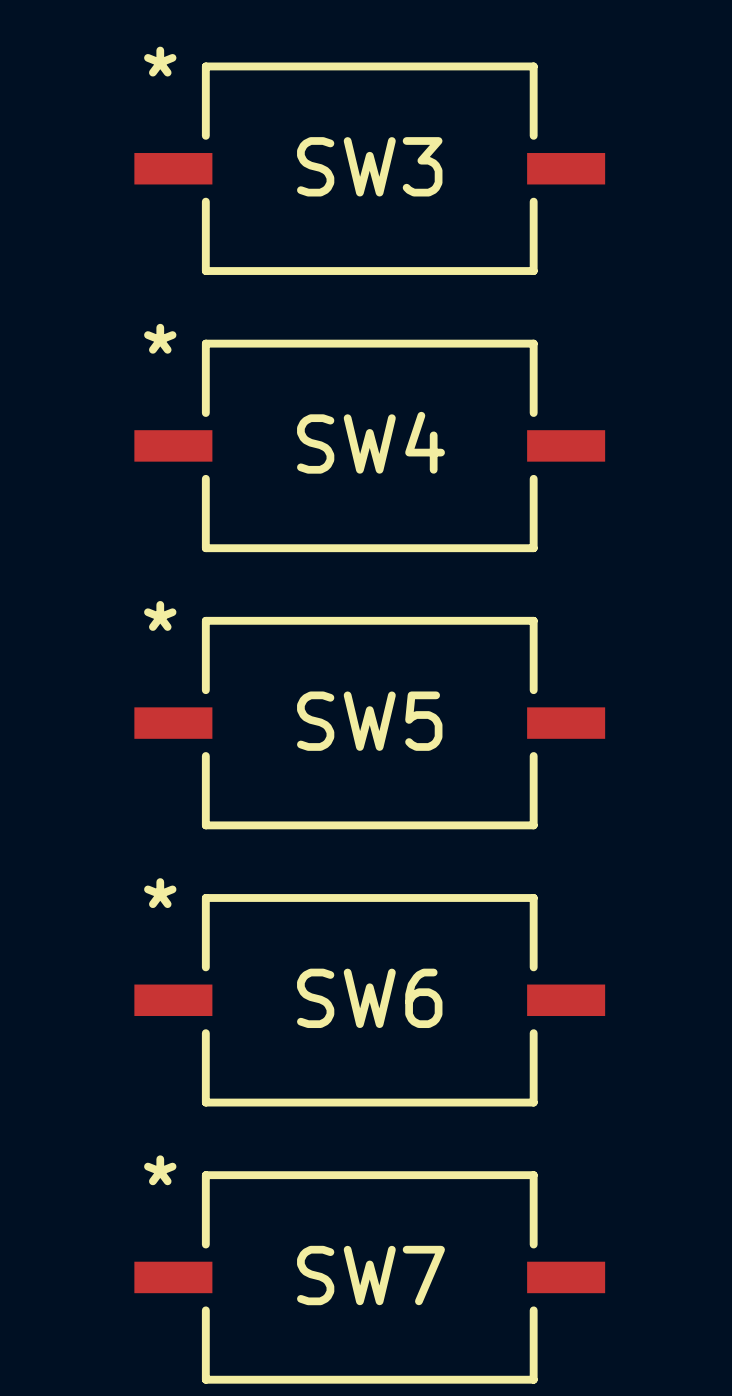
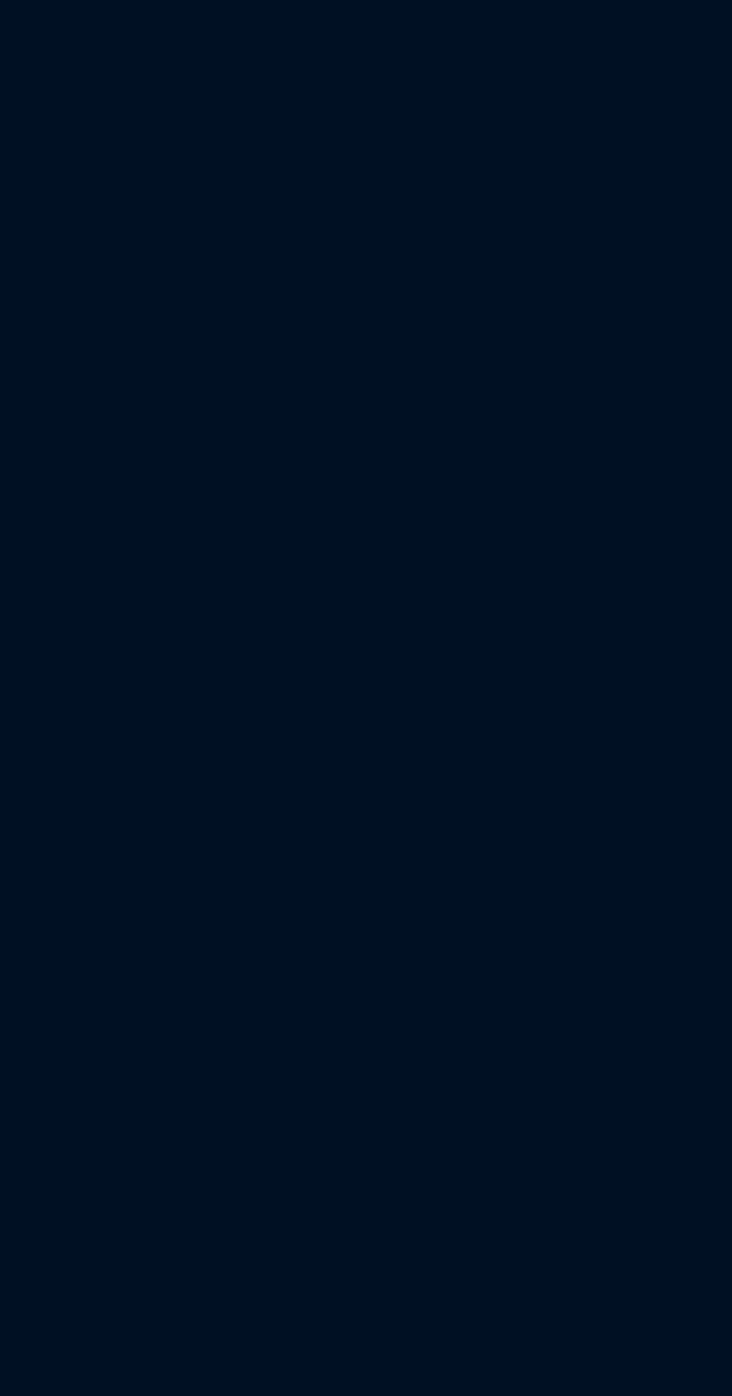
SW3: (369, 168) -> none
SW4: (369, 445) -> none
SW5: (369, 723) -> none
SW6: (369, 1000) -> none
SW7: (369, 1277) -> none

